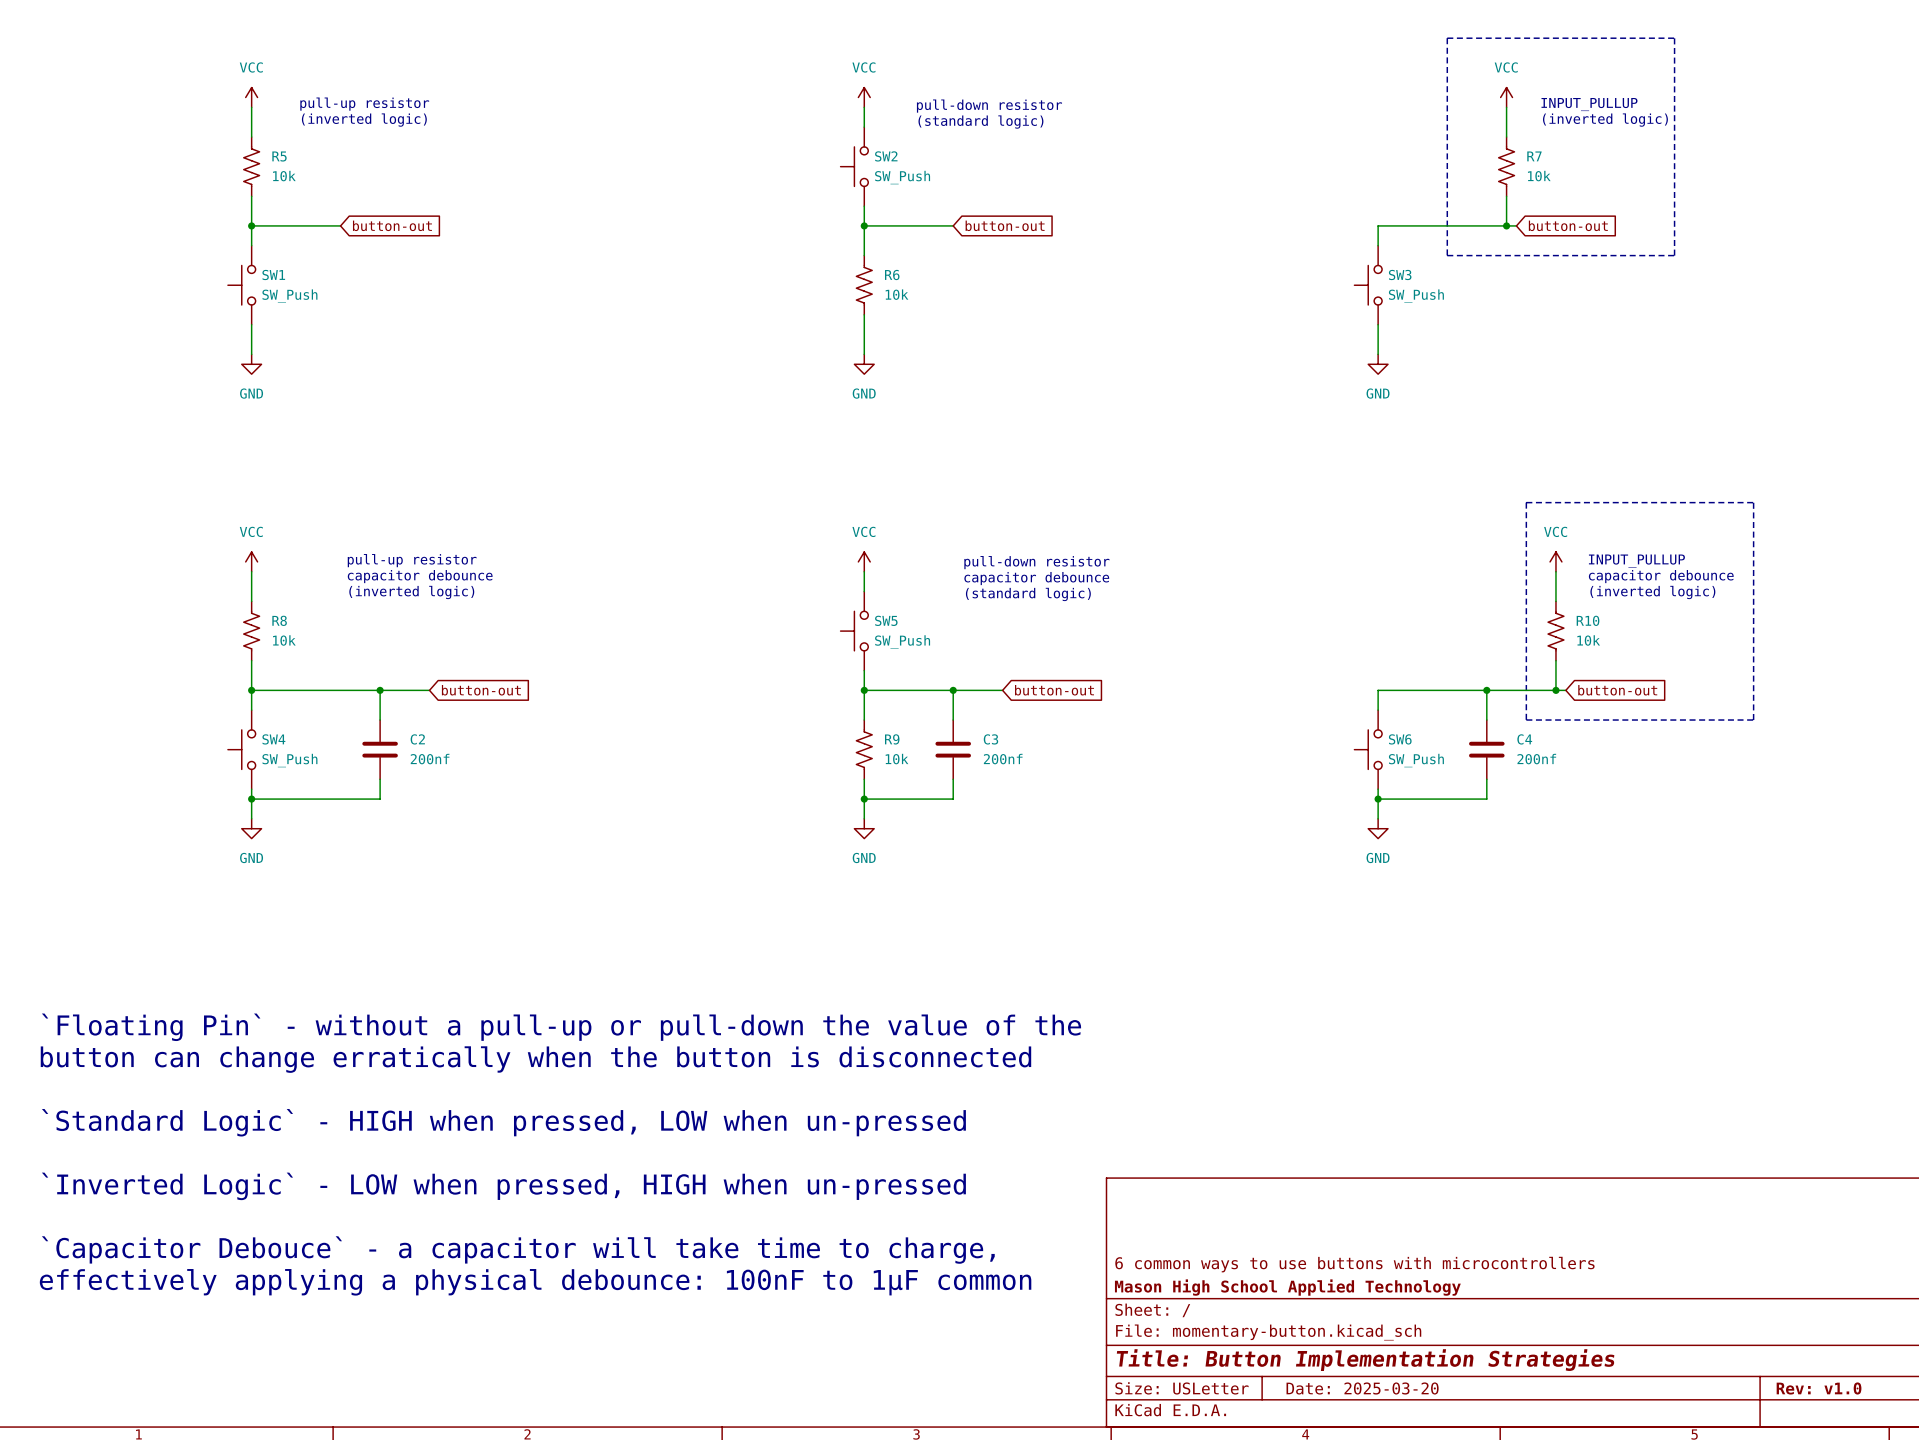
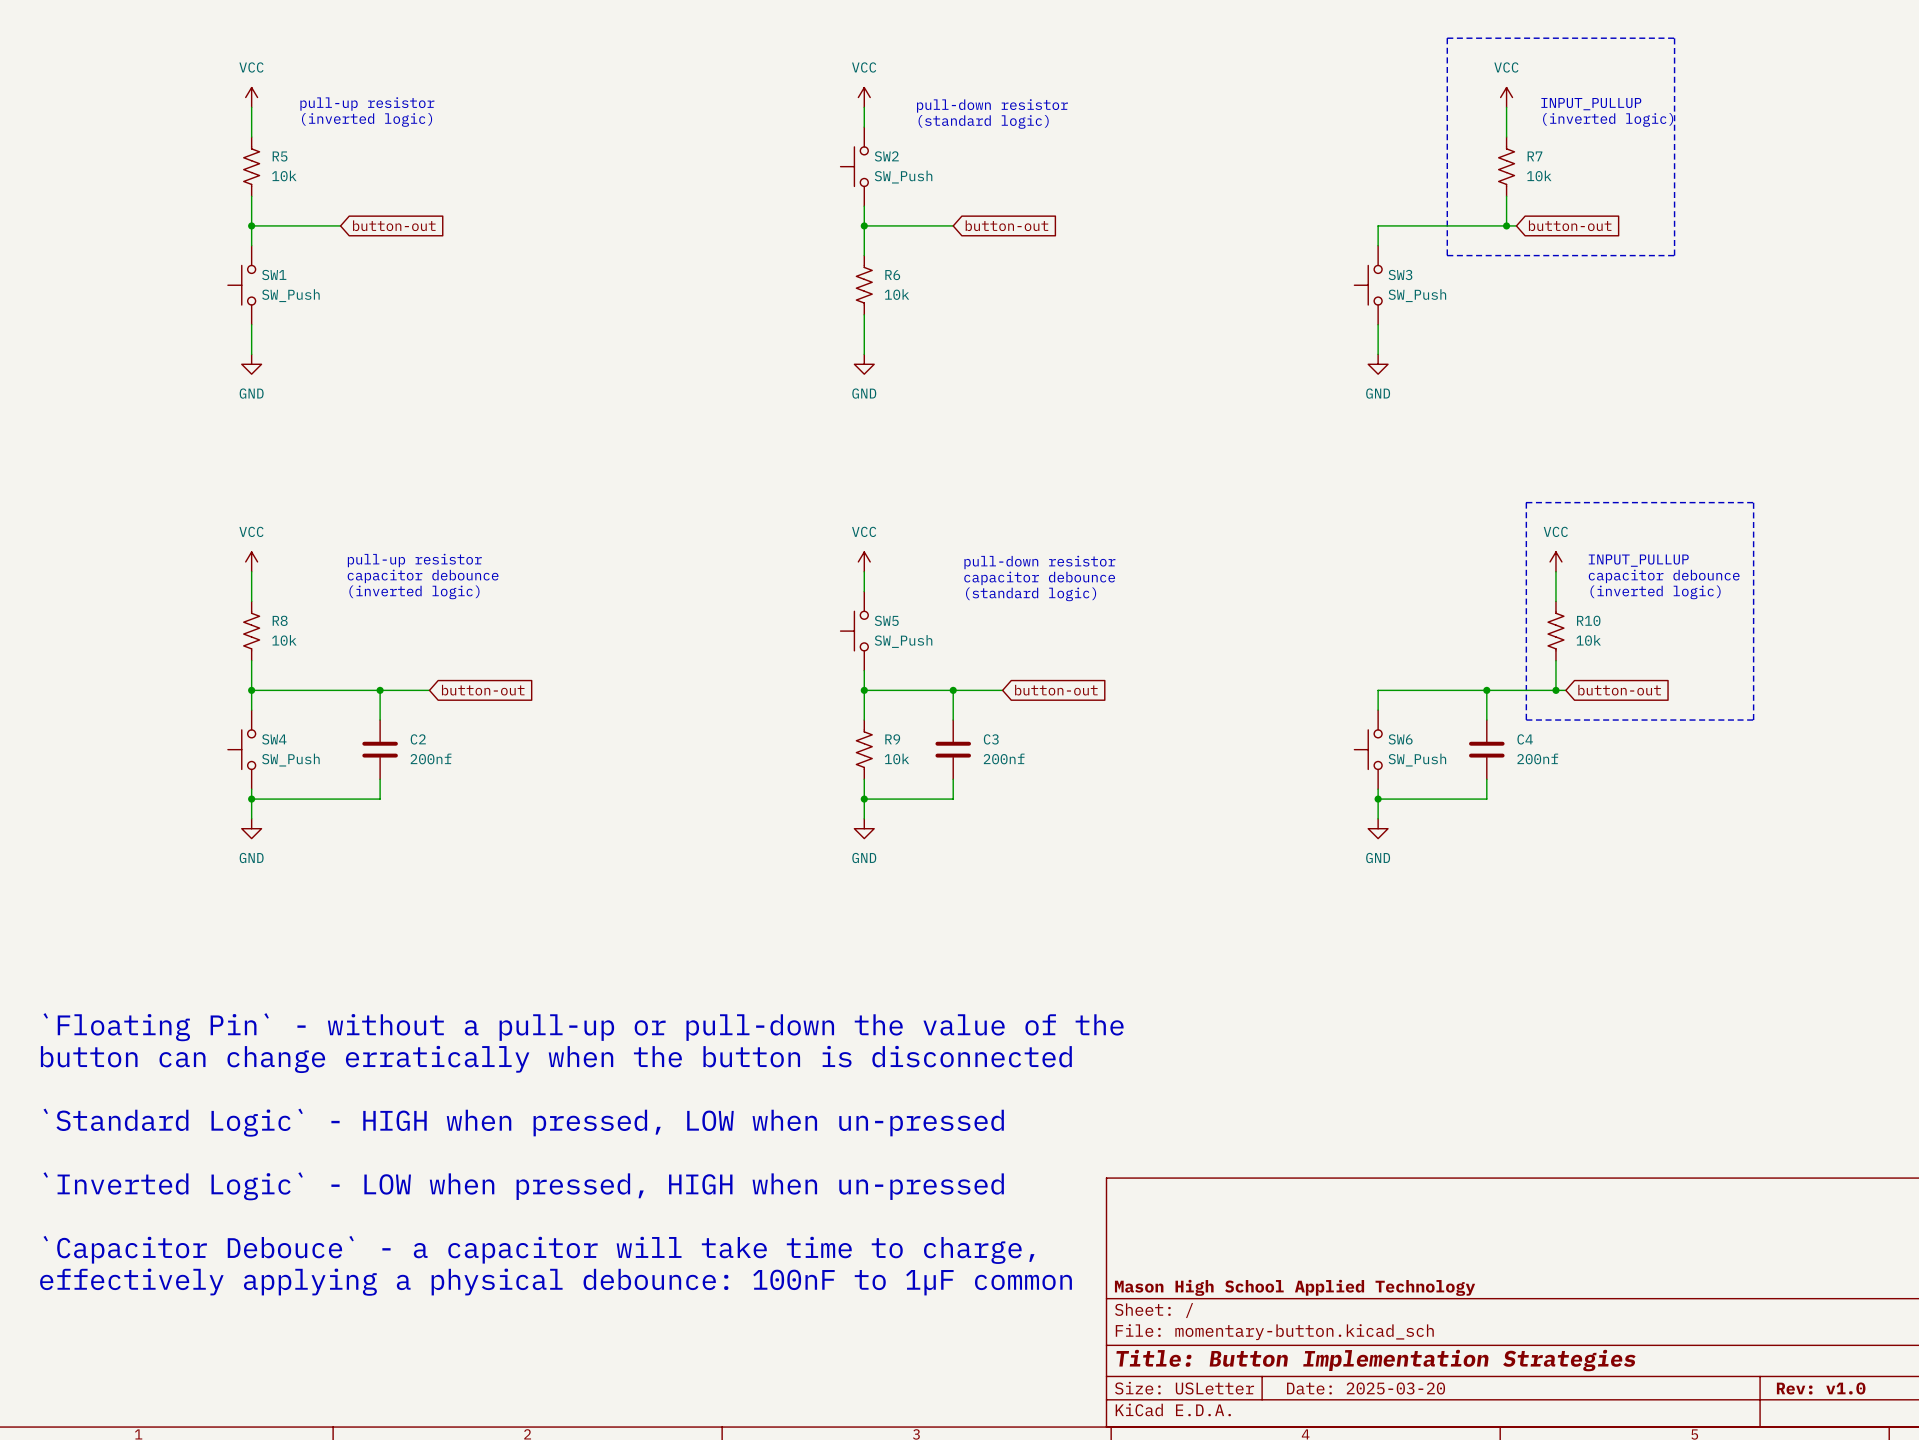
title block: 6 common ways to use buttons with microcontrollers (1354, 1264) -> none

